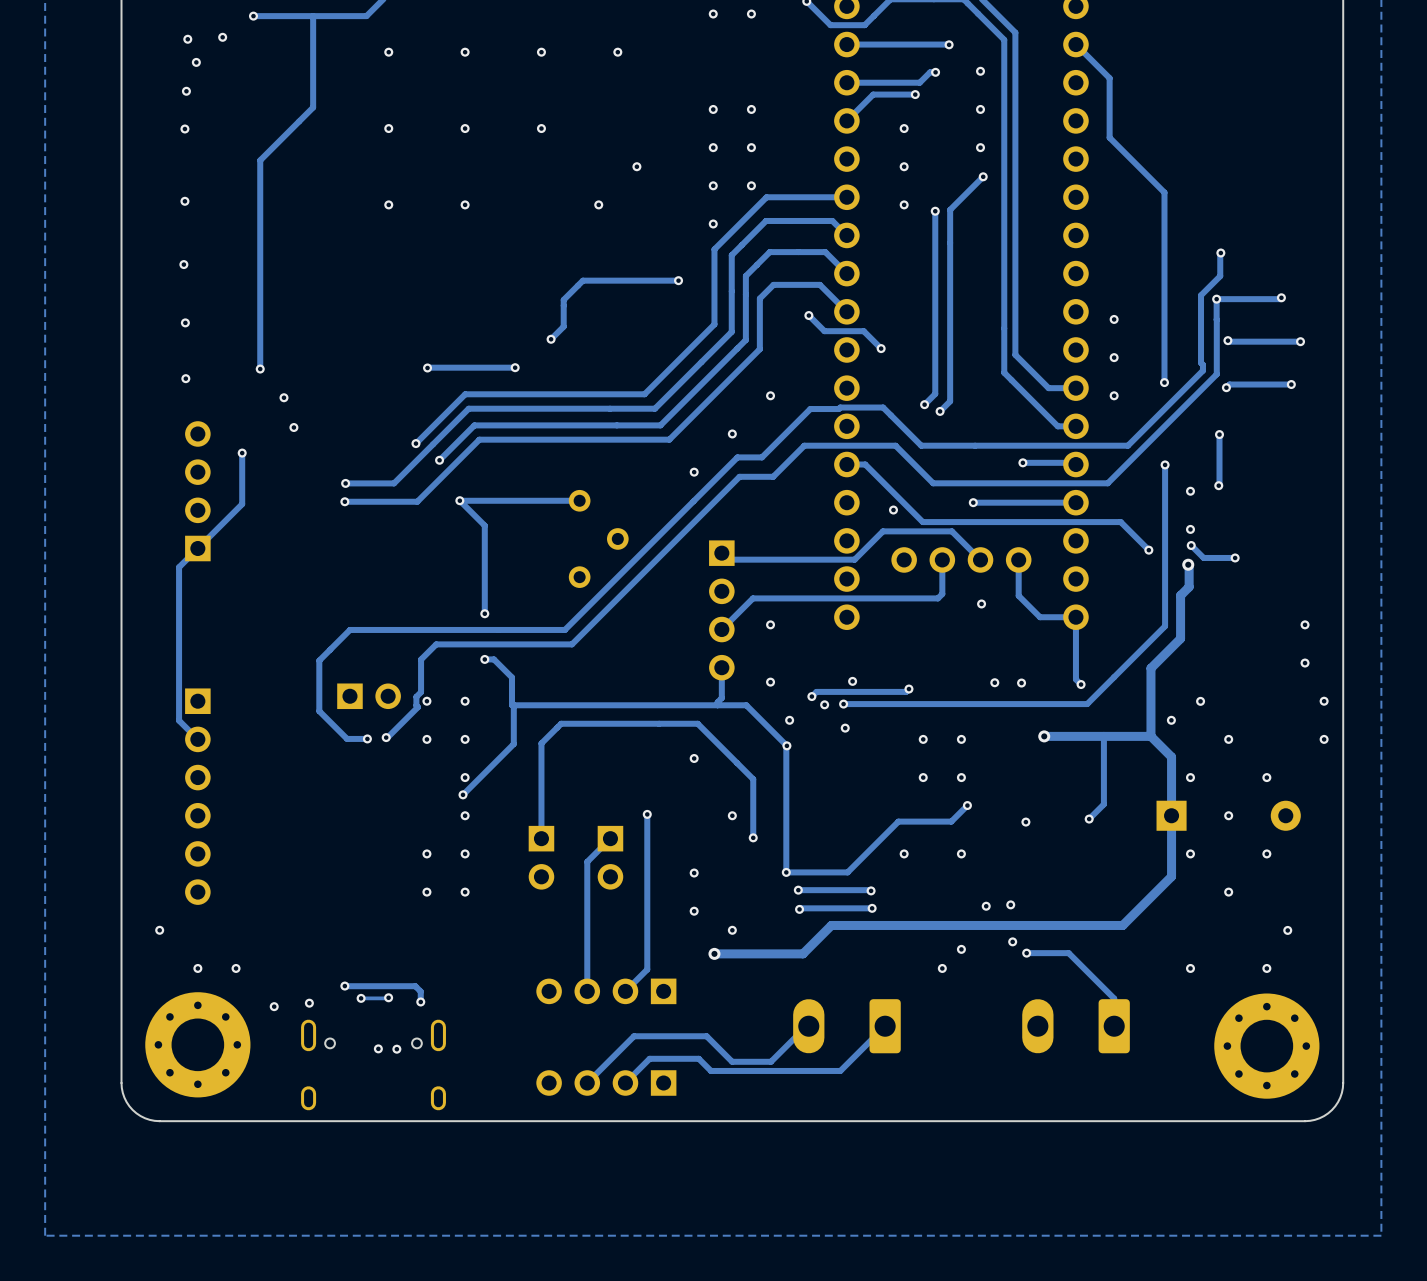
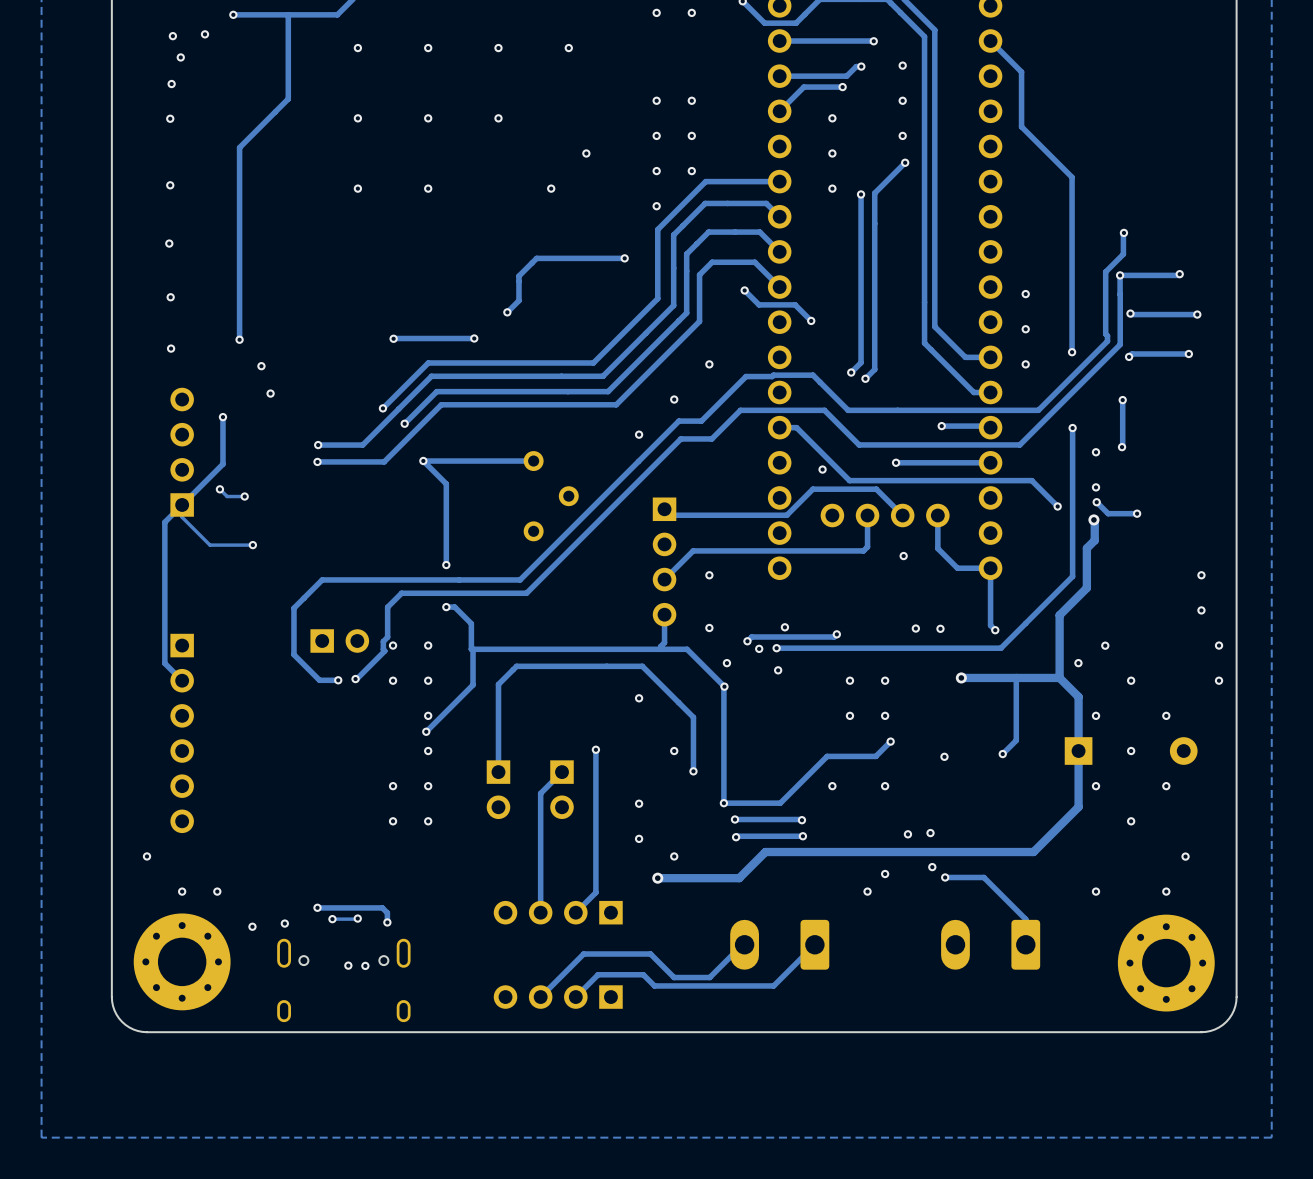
track: none -> (219, 489) (227, 496) (244, 496)
via: none -> (219, 489)
via: none -> (244, 496)
track: none -> (182, 504) (182, 517) (209, 545) (252, 545)
via: none -> (252, 545)

